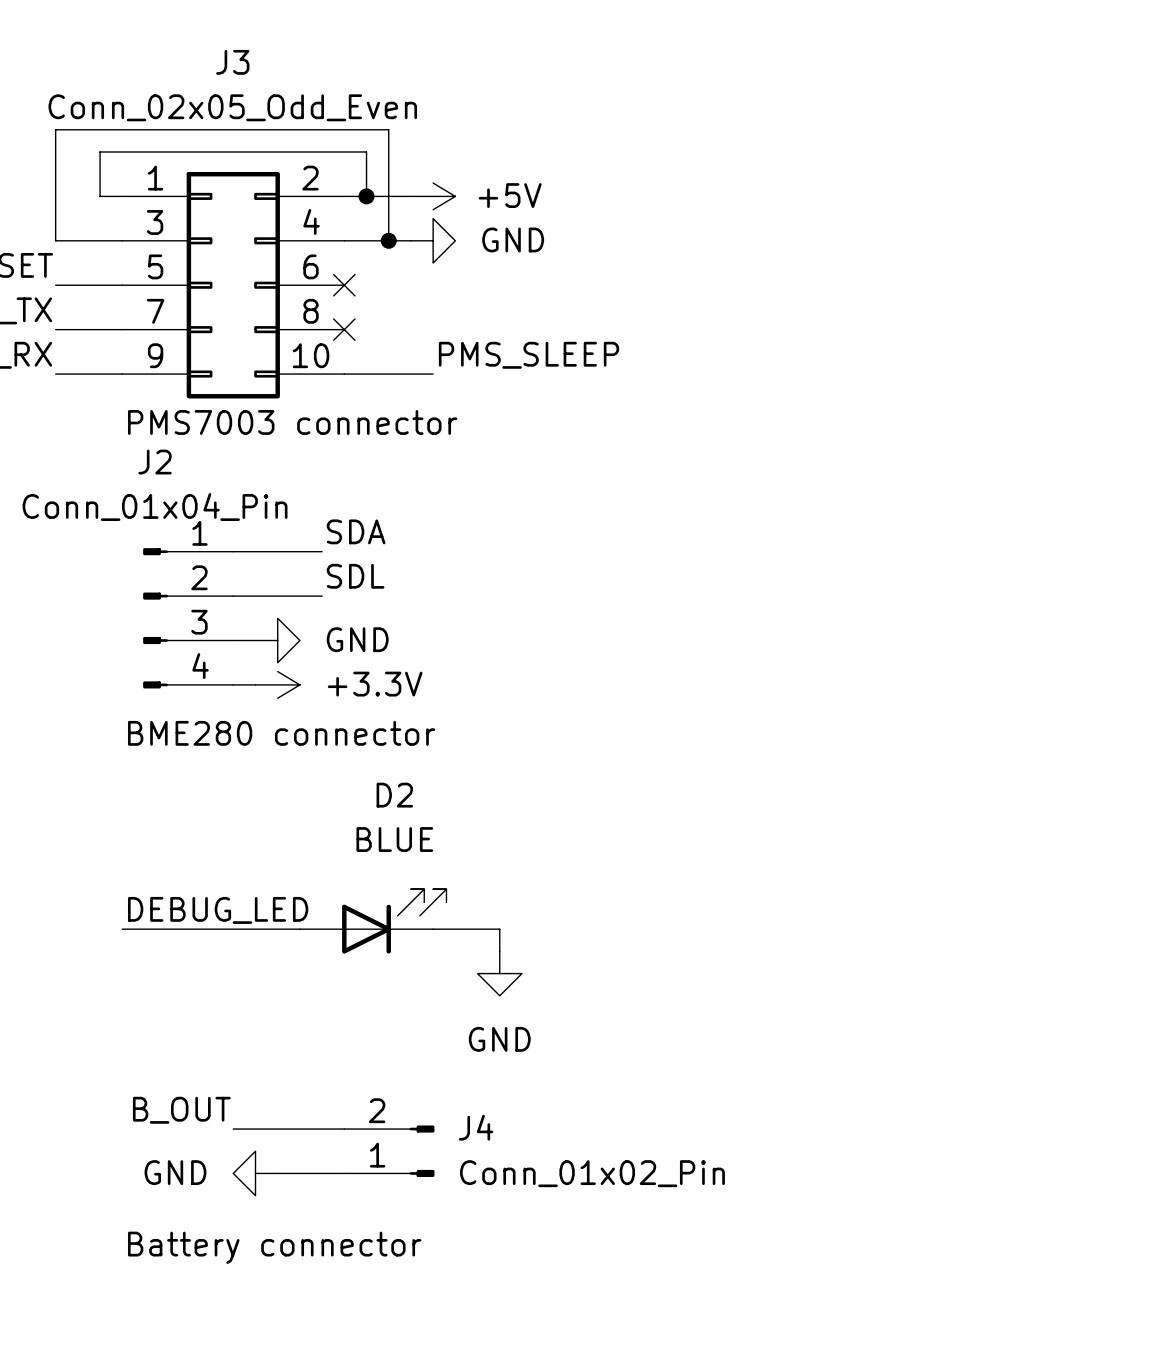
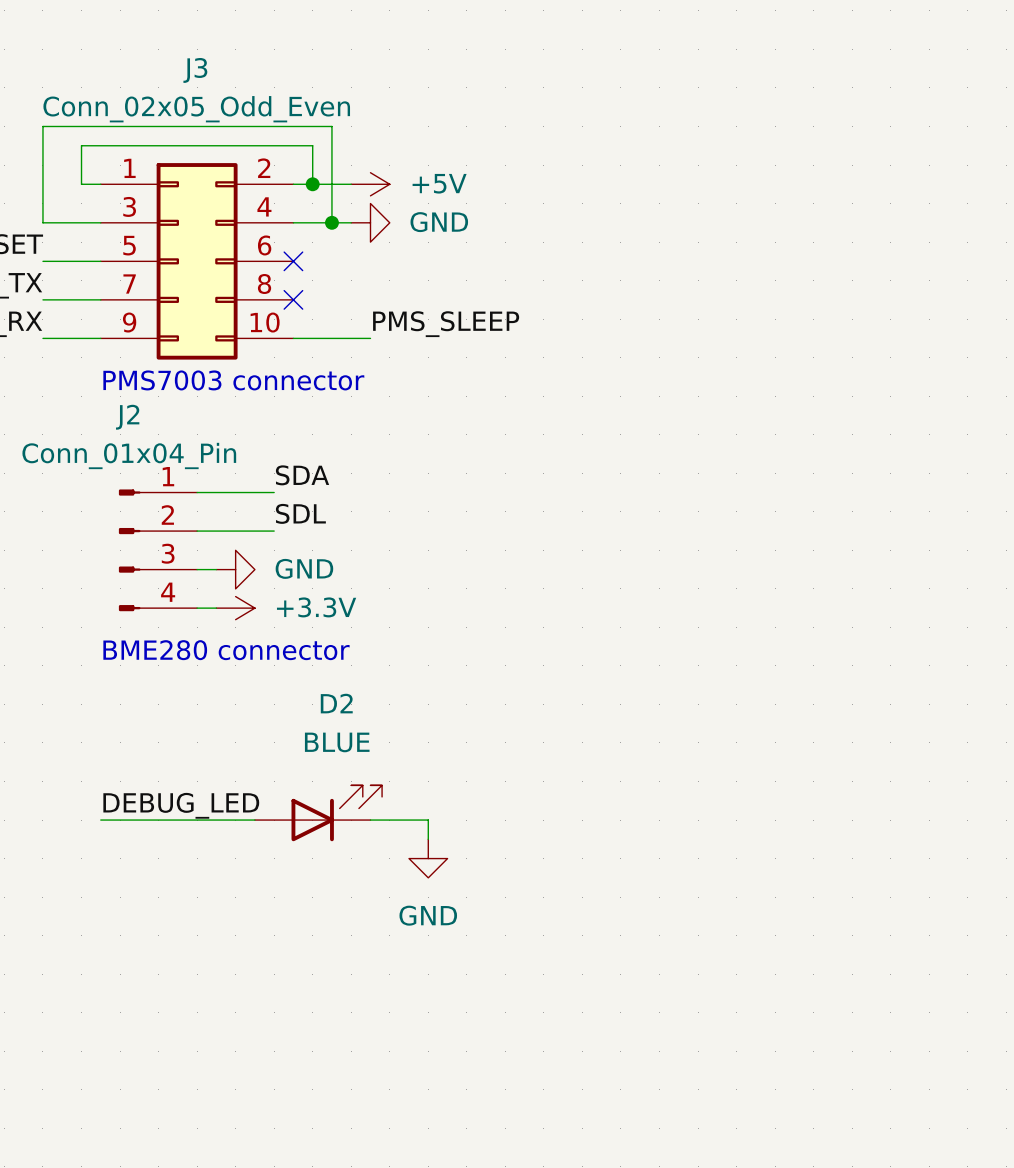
label: B_OUT (181, 1110) -> none
wire: (233, 1129) (344, 1129) -> none
J4: Conn_01x02_Pin (389, 1151) -> none
power symbol: GND (255, 1173) -> none
wire: (277, 1173) (344, 1173) -> none
text: Battery connector (274, 1247) -> none

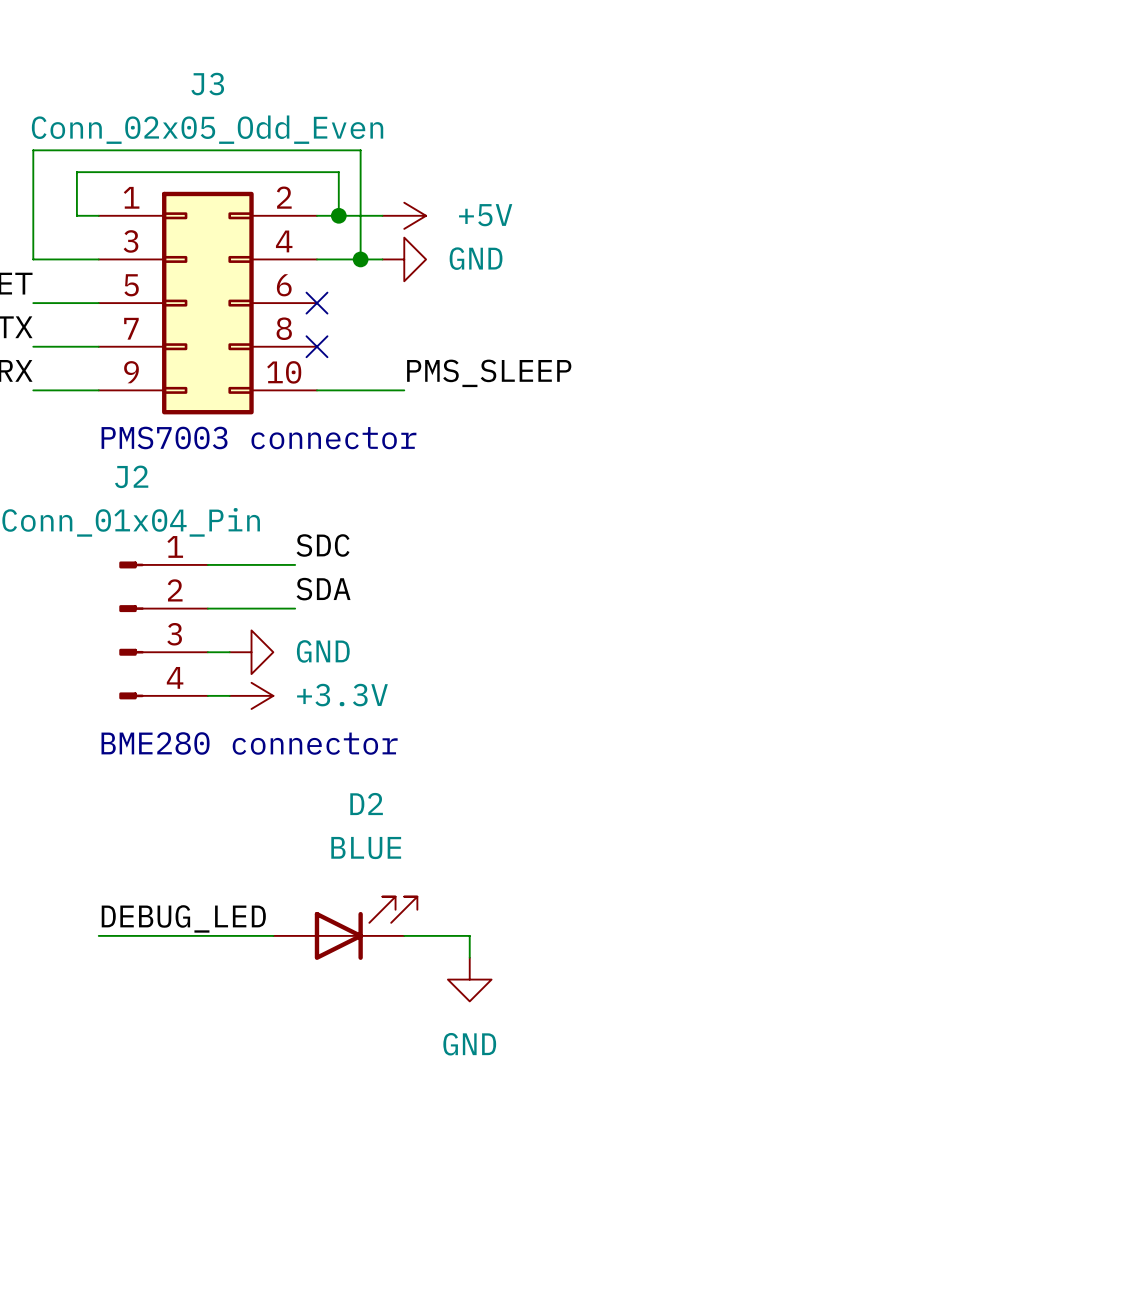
label: SDA (302, 475) -> SDC (323, 545)
label: SDL (300, 513) -> SDA (323, 589)

